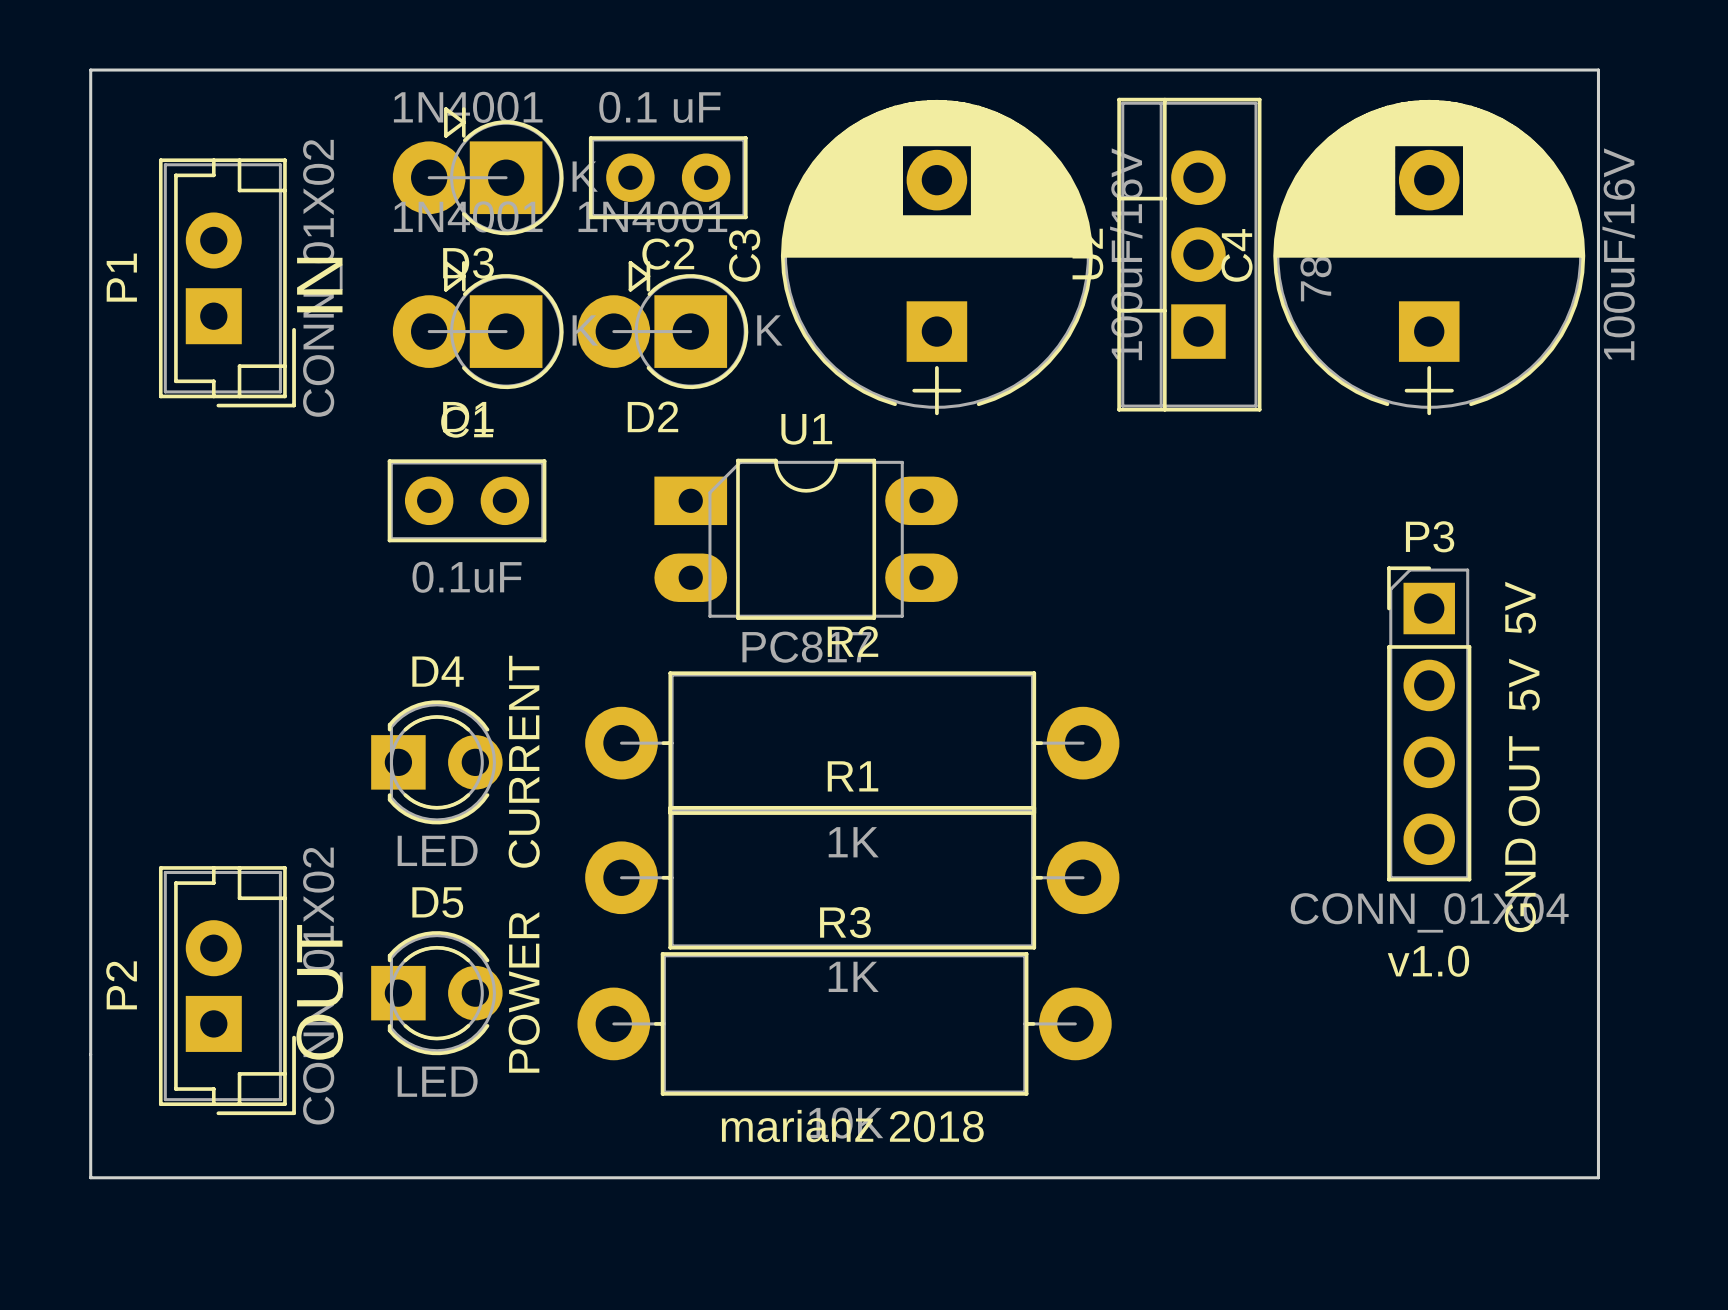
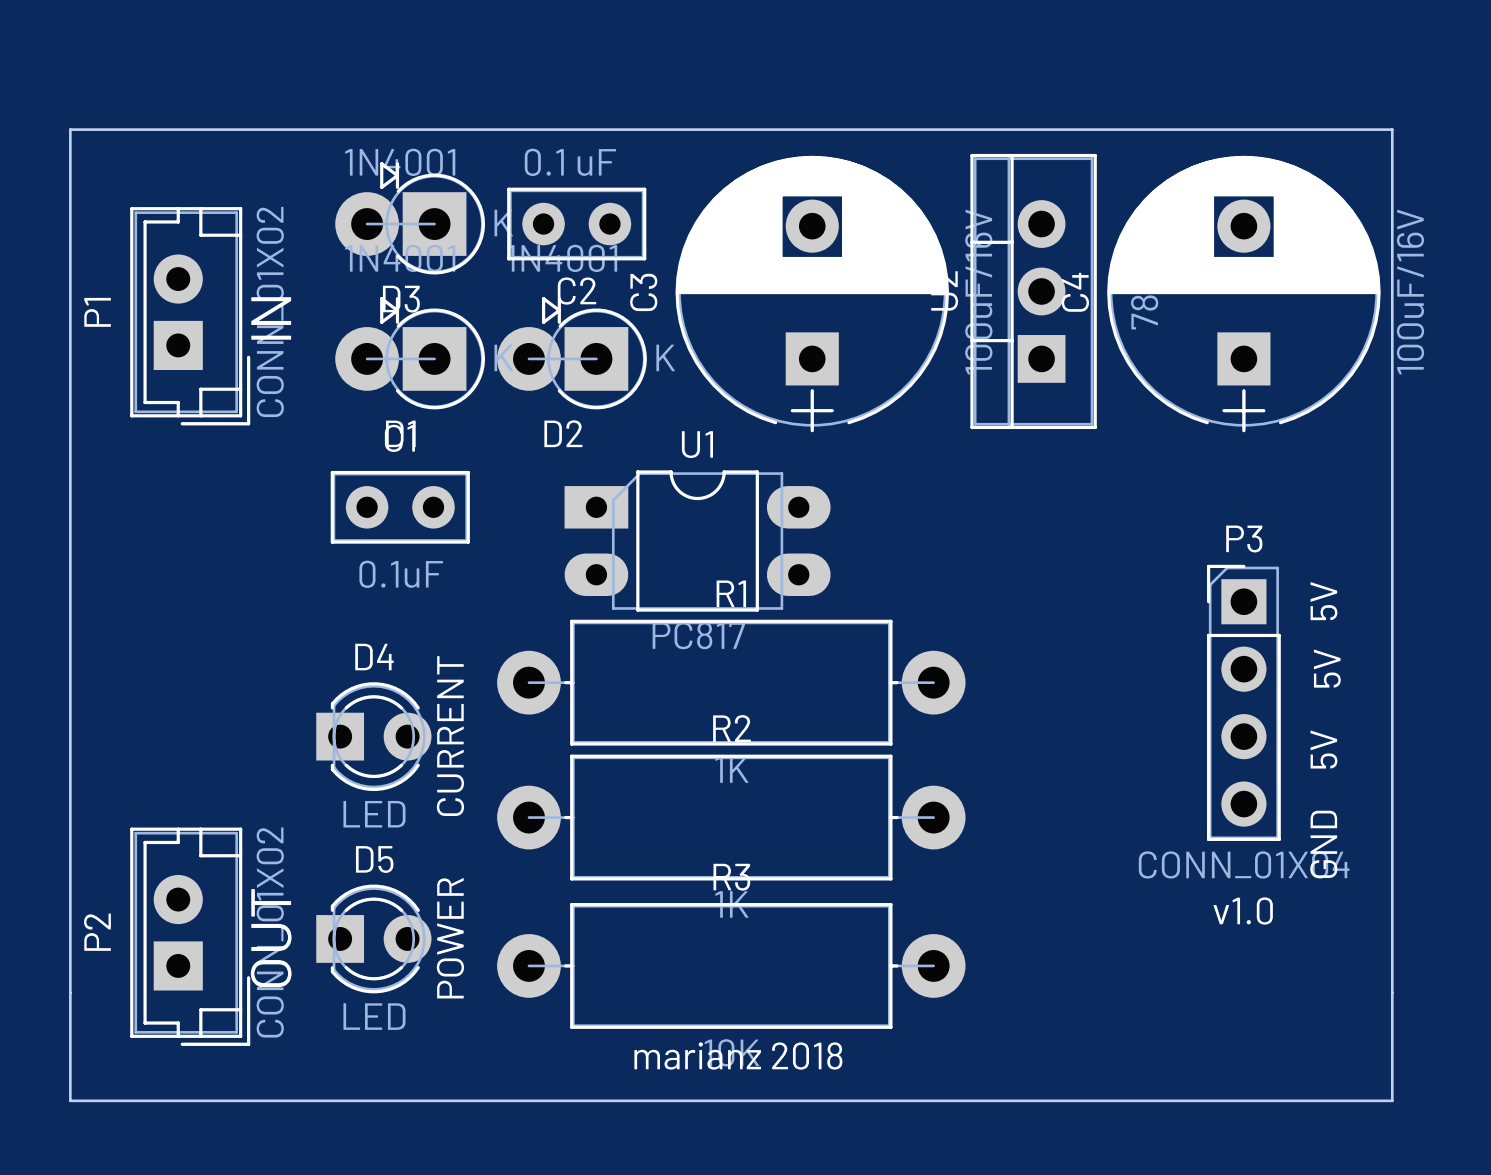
R2 position: (852, 743) -> (731, 817)
text: OUT (1524, 781) -> 5V (1323, 749)
R1 position: (852, 877) -> (731, 682)

